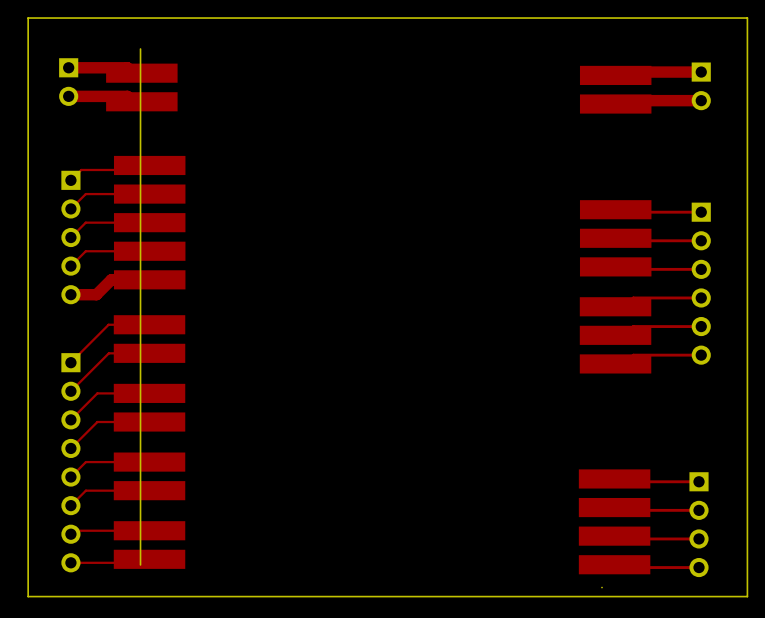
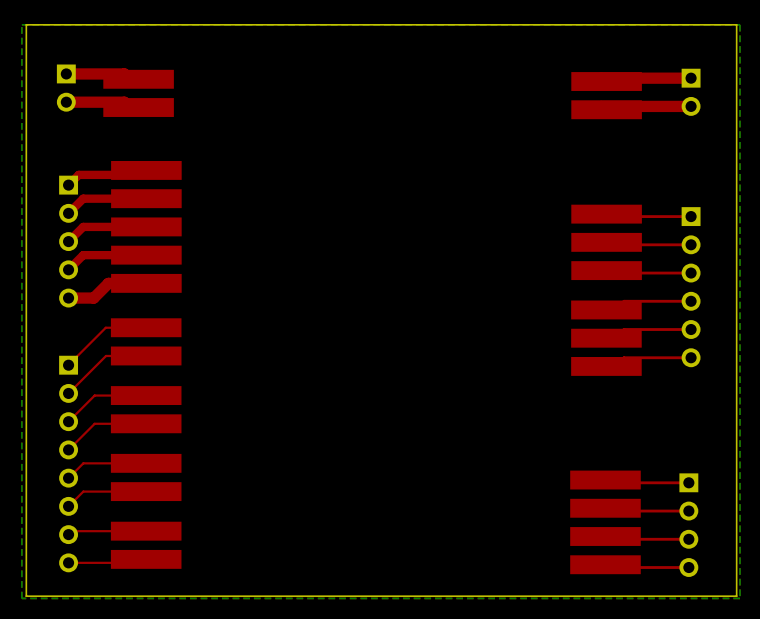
bottom zone outline: none -> (739, 24) (739, 598) (21, 598) (21, 24) (739, 24)
board edge: (140, 49) (140, 564) -> none
top track width: thin (136, 169) (81, 169) (70, 180) -> thick (133, 174) (78, 174) (68, 185)
top track width: thin (140, 194) (85, 194) (70, 208) -> thick (137, 198) (83, 198) (68, 213)
top track width: thin (140, 222) (85, 222) (70, 237) -> thick (137, 226) (83, 226) (68, 241)
top track width: thin (140, 251) (85, 251) (70, 266) -> thick (137, 255) (83, 255) (68, 269)

